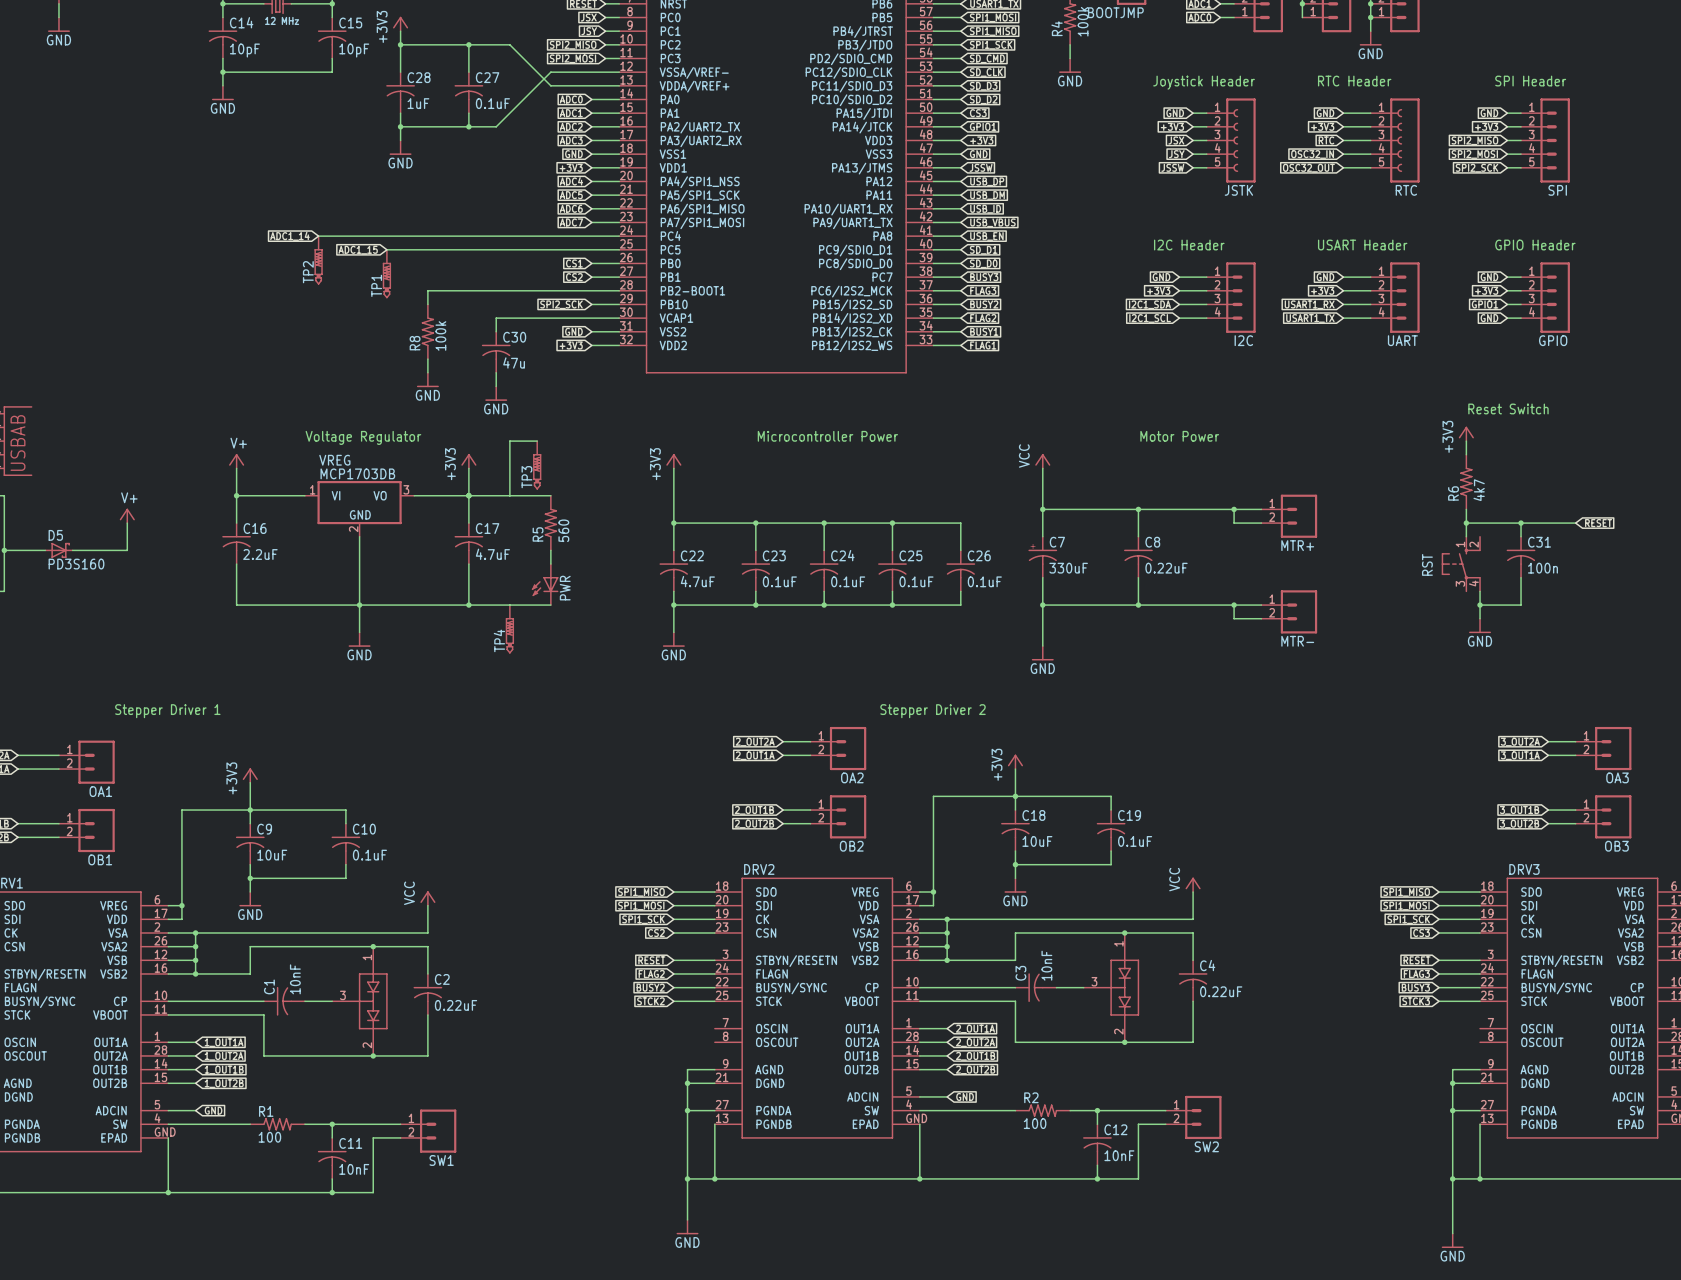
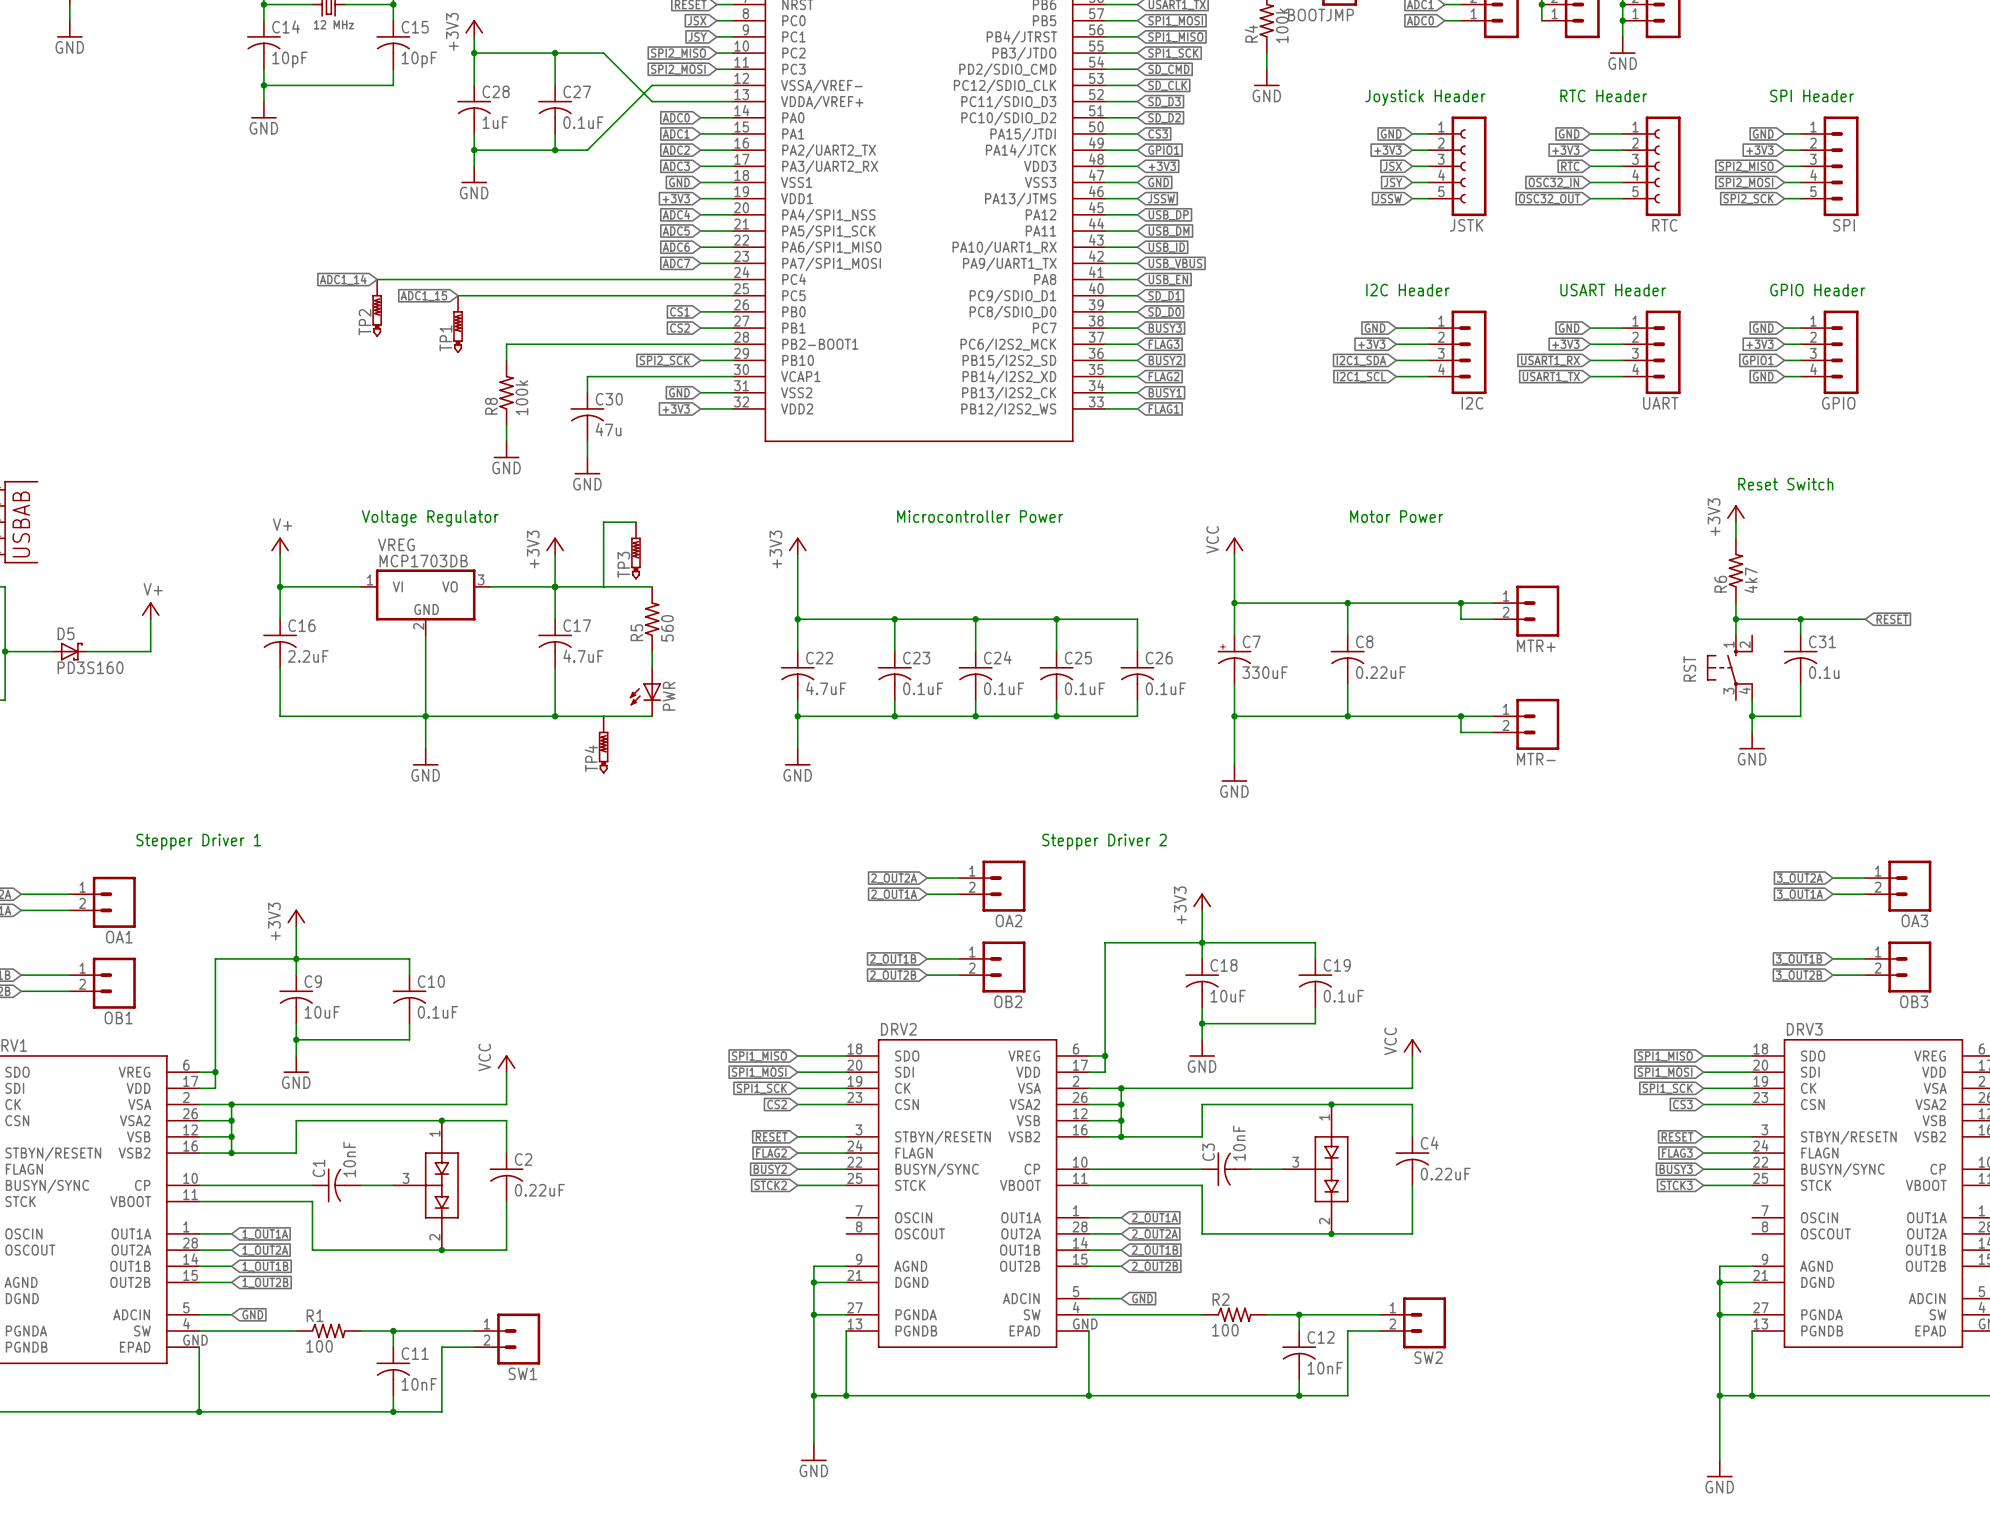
C31 value: 100n (1542, 568) -> 0.1u (1824, 672)

